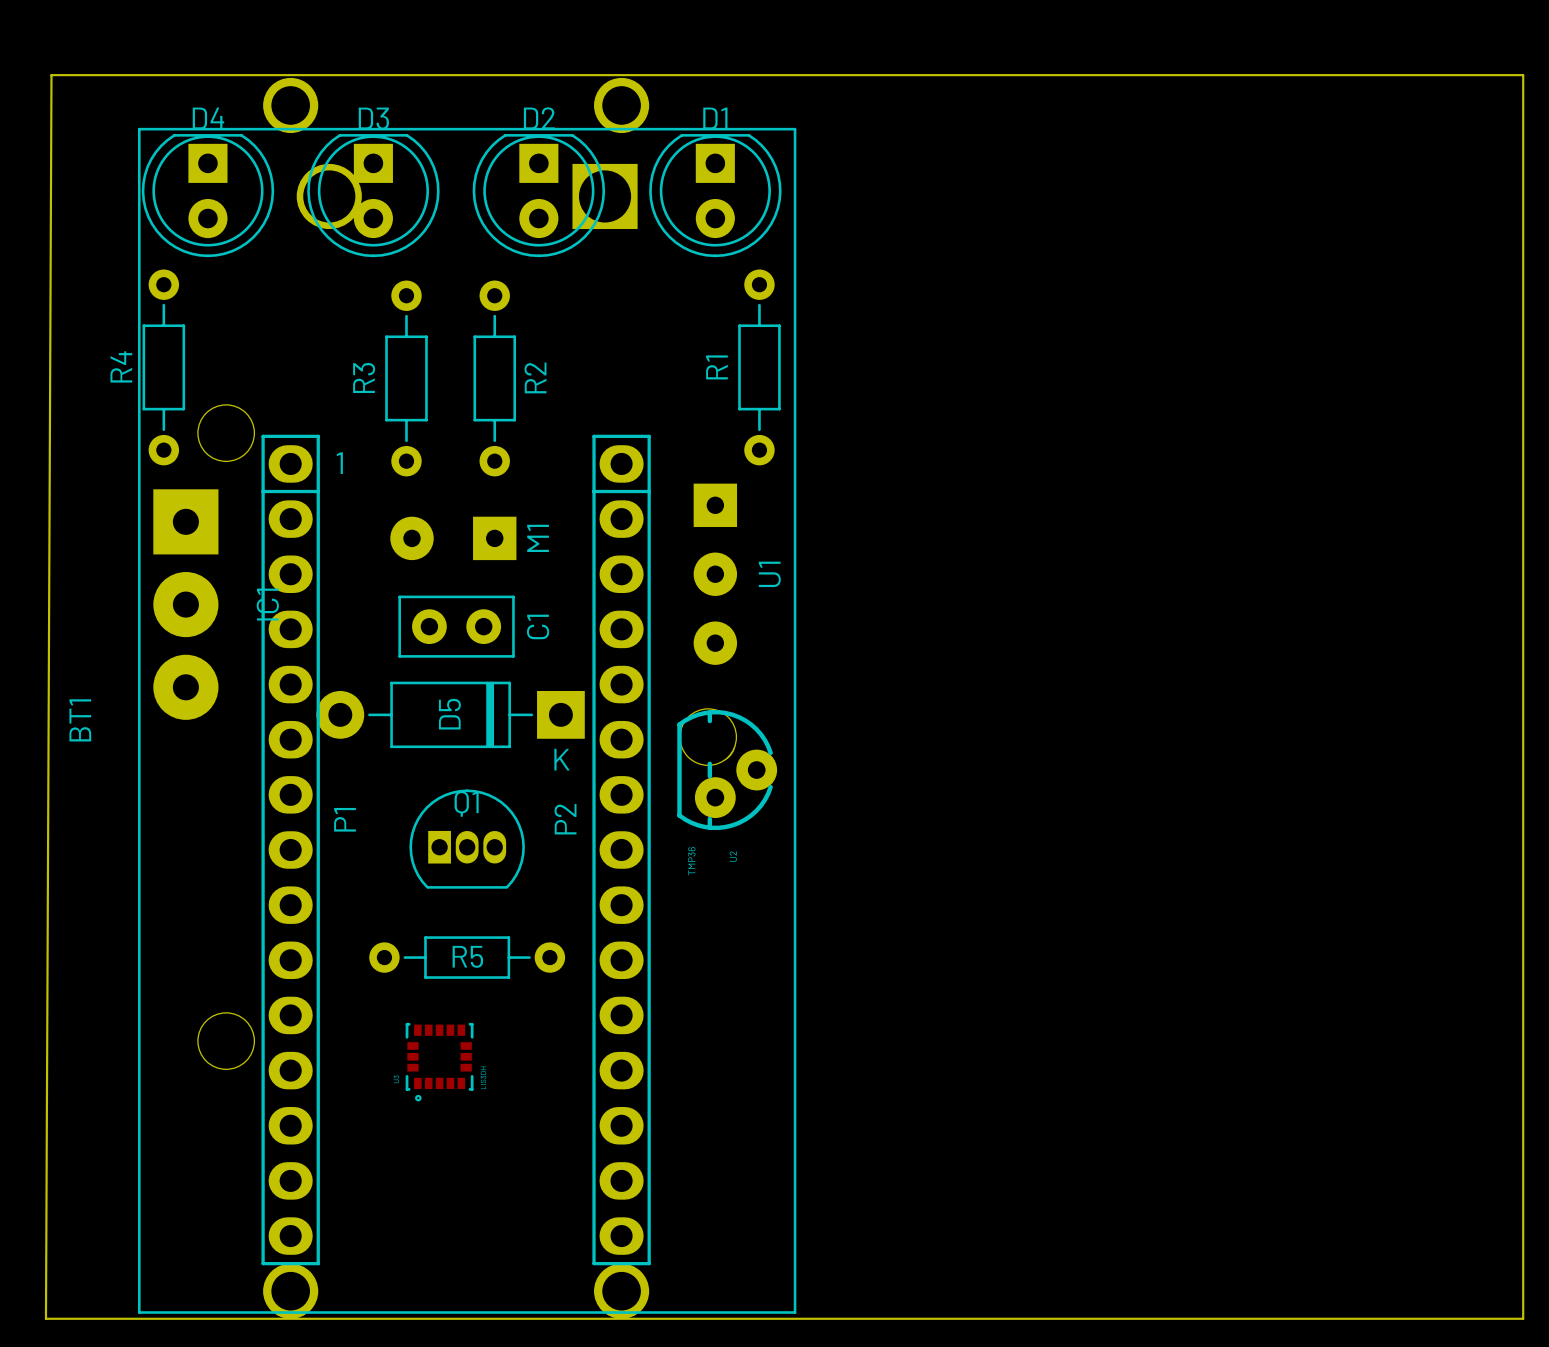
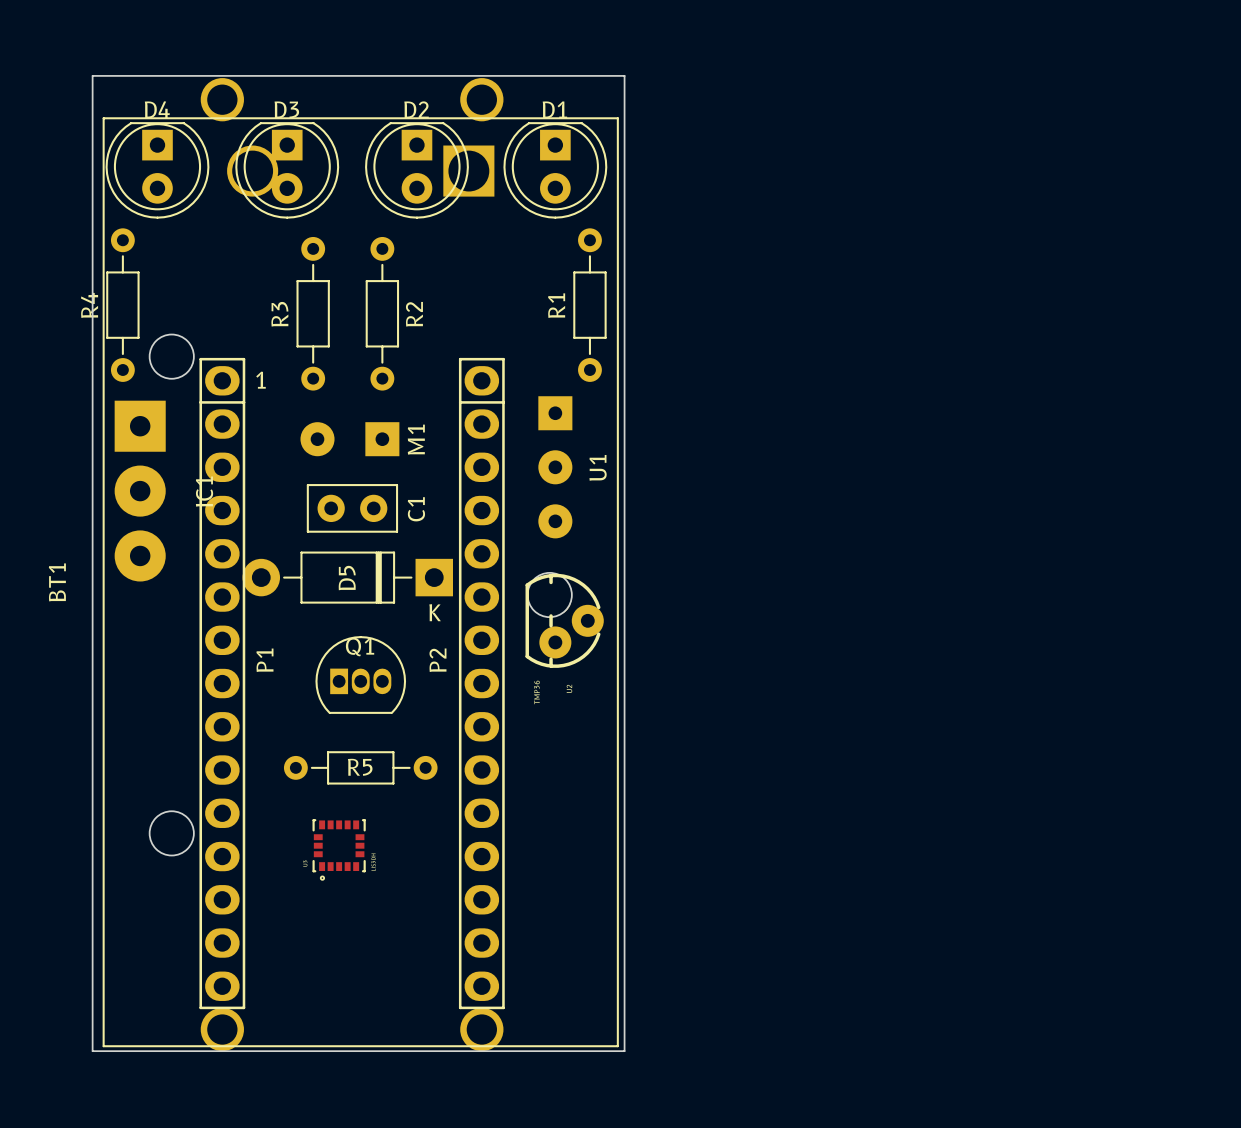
board edge: (125, 75) (51, 75) (45, 1318) (125, 1318) -> (92, 75) (92, 1051)
board edge: (803, 75) (1523, 75) (1523, 1318) (803, 1318) -> (624, 75) (624, 1051)

